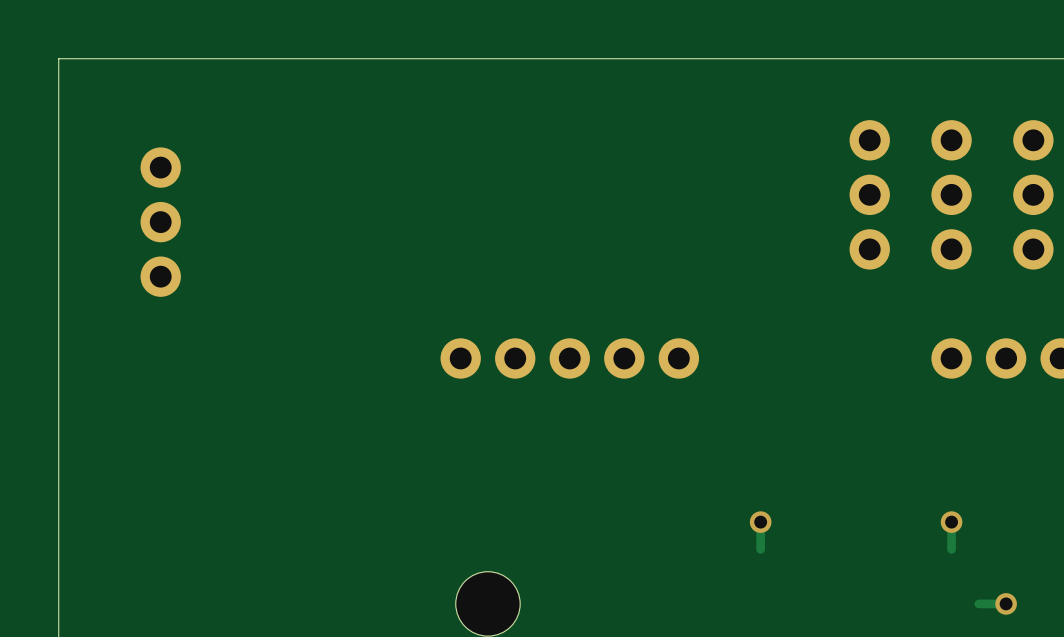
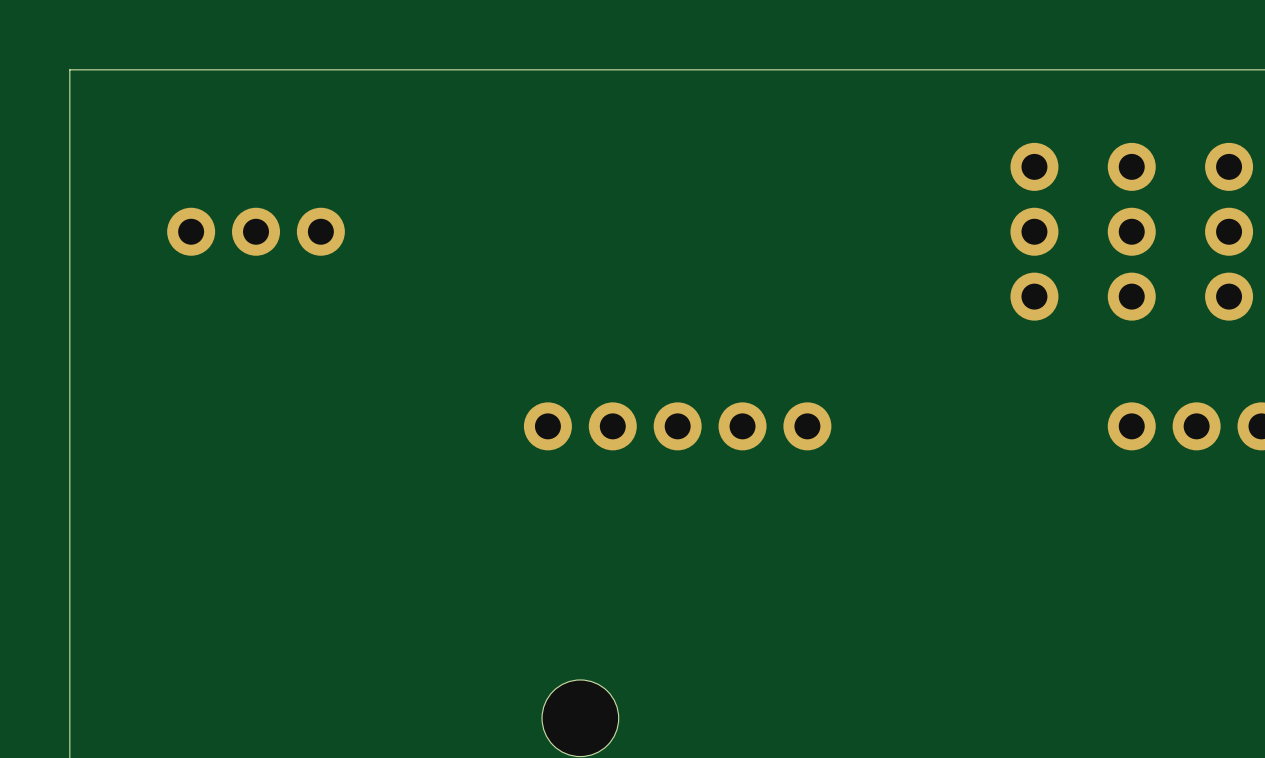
part rotation: 0° (160, 222) -> 90° clockwise (256, 231)
track: (760, 522) (760, 549) -> none
via: (760, 522) -> none
track: (951, 522) (951, 549) -> none
via: (951, 522) -> none
track: (1006, 603) (978, 603) -> none
via: (1006, 603) -> none

